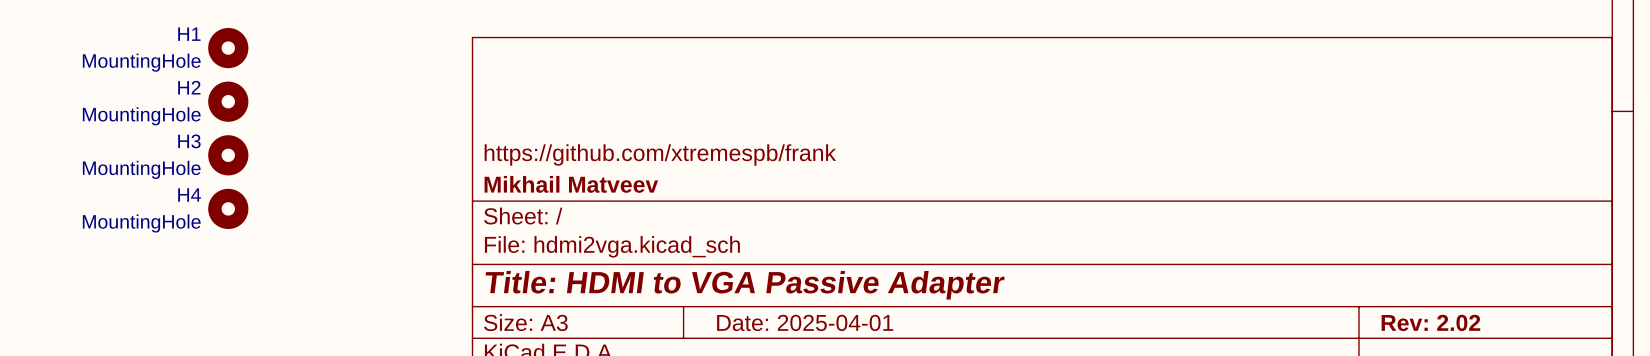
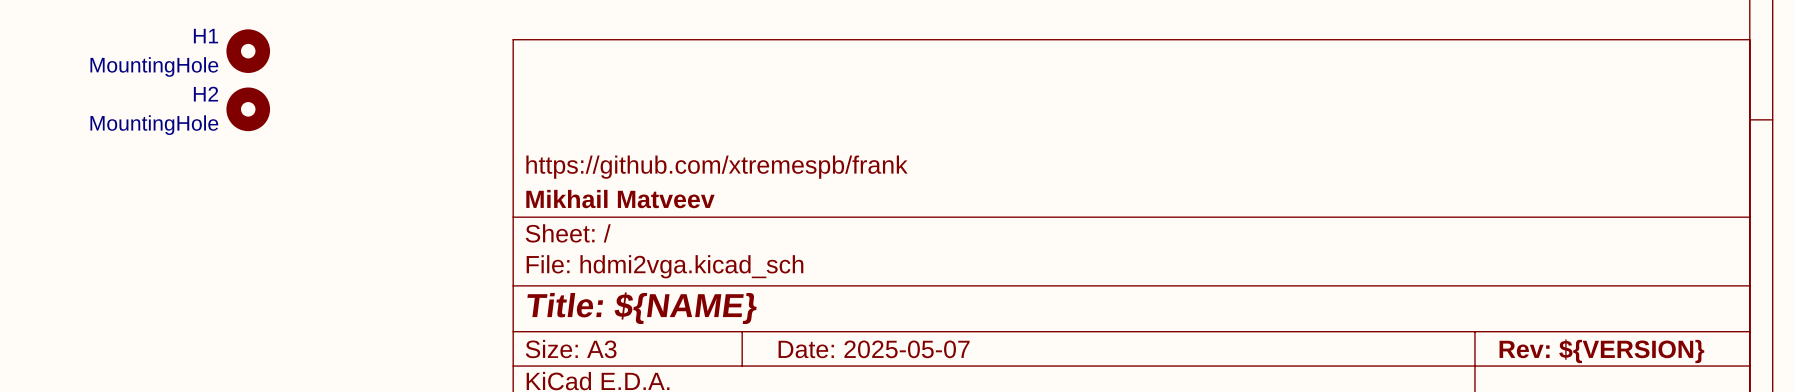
H3: MountingHole (228, 155) -> none
H4: MountingHole (228, 208) -> none
title block: Title: HDMI to VGA Passive Adapter (745, 285) -> Title: ${NAME} (642, 308)
title block: Date: 2025-04-01 (805, 322) -> Date: 2025-05-07 (874, 349)
title block: Rev: 2.02 (1430, 322) -> Rev: ${VERSION} (1601, 351)

